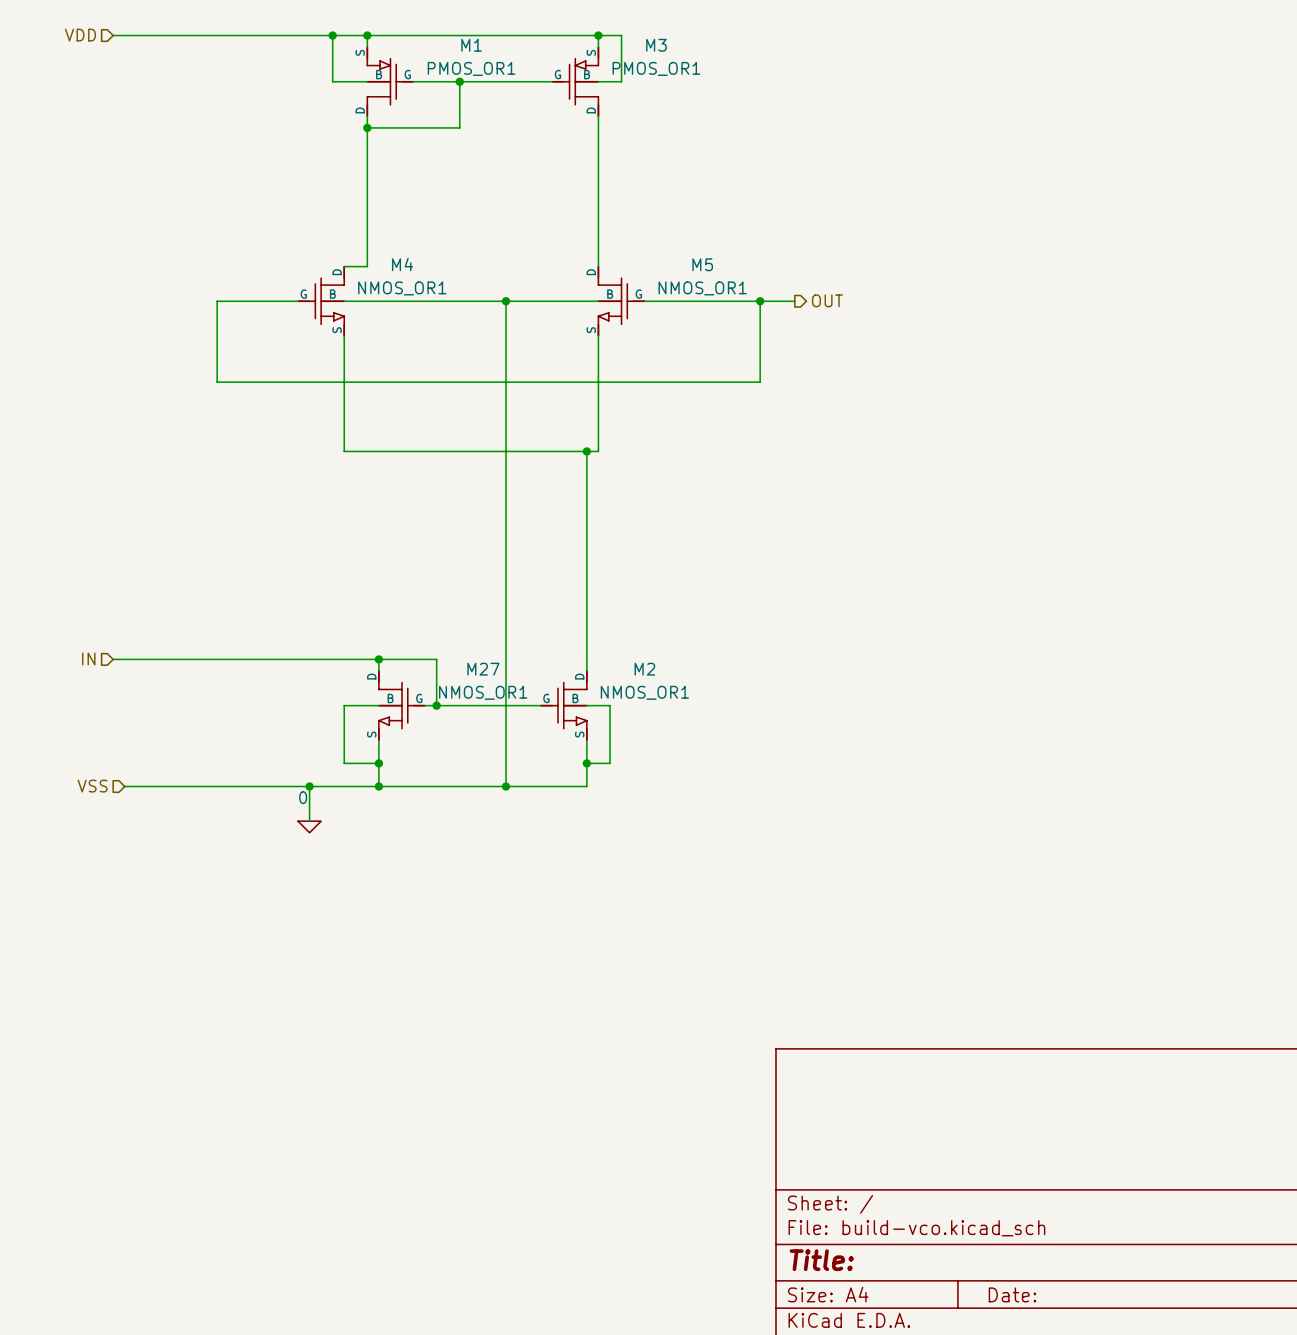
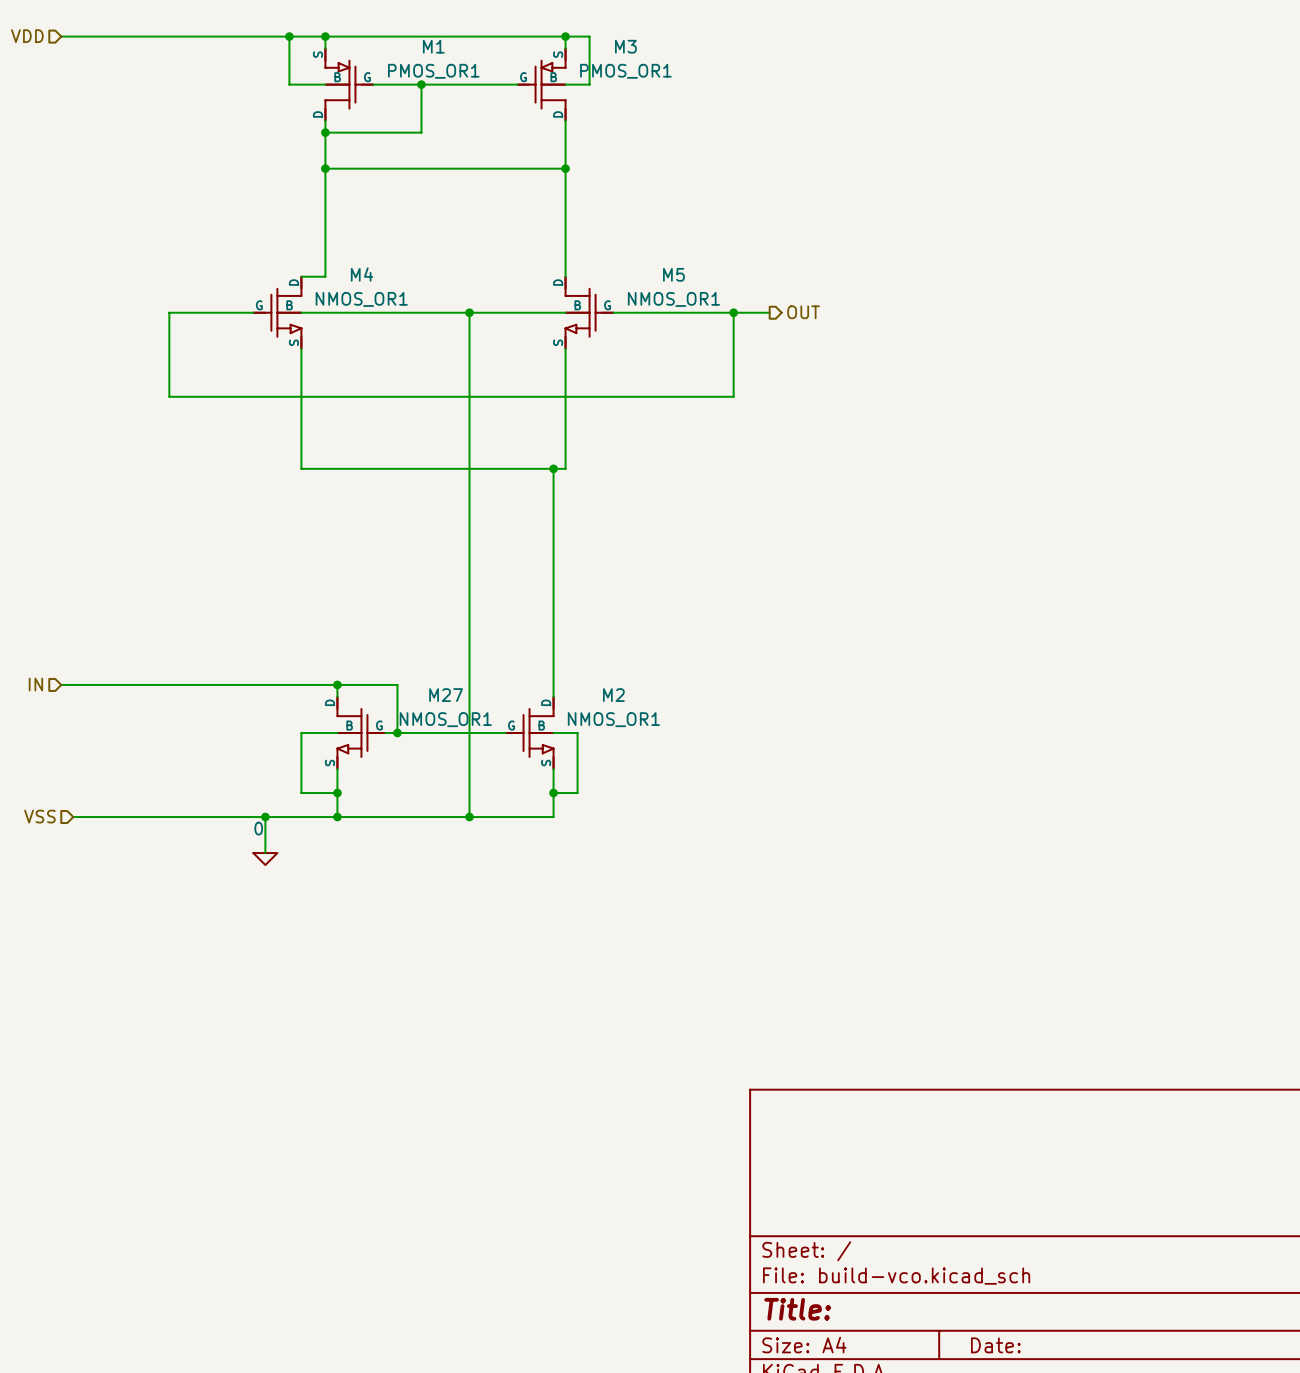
wire: none -> (325, 168) (565, 168)
junction: none -> (325, 168)
junction: none -> (565, 168)

